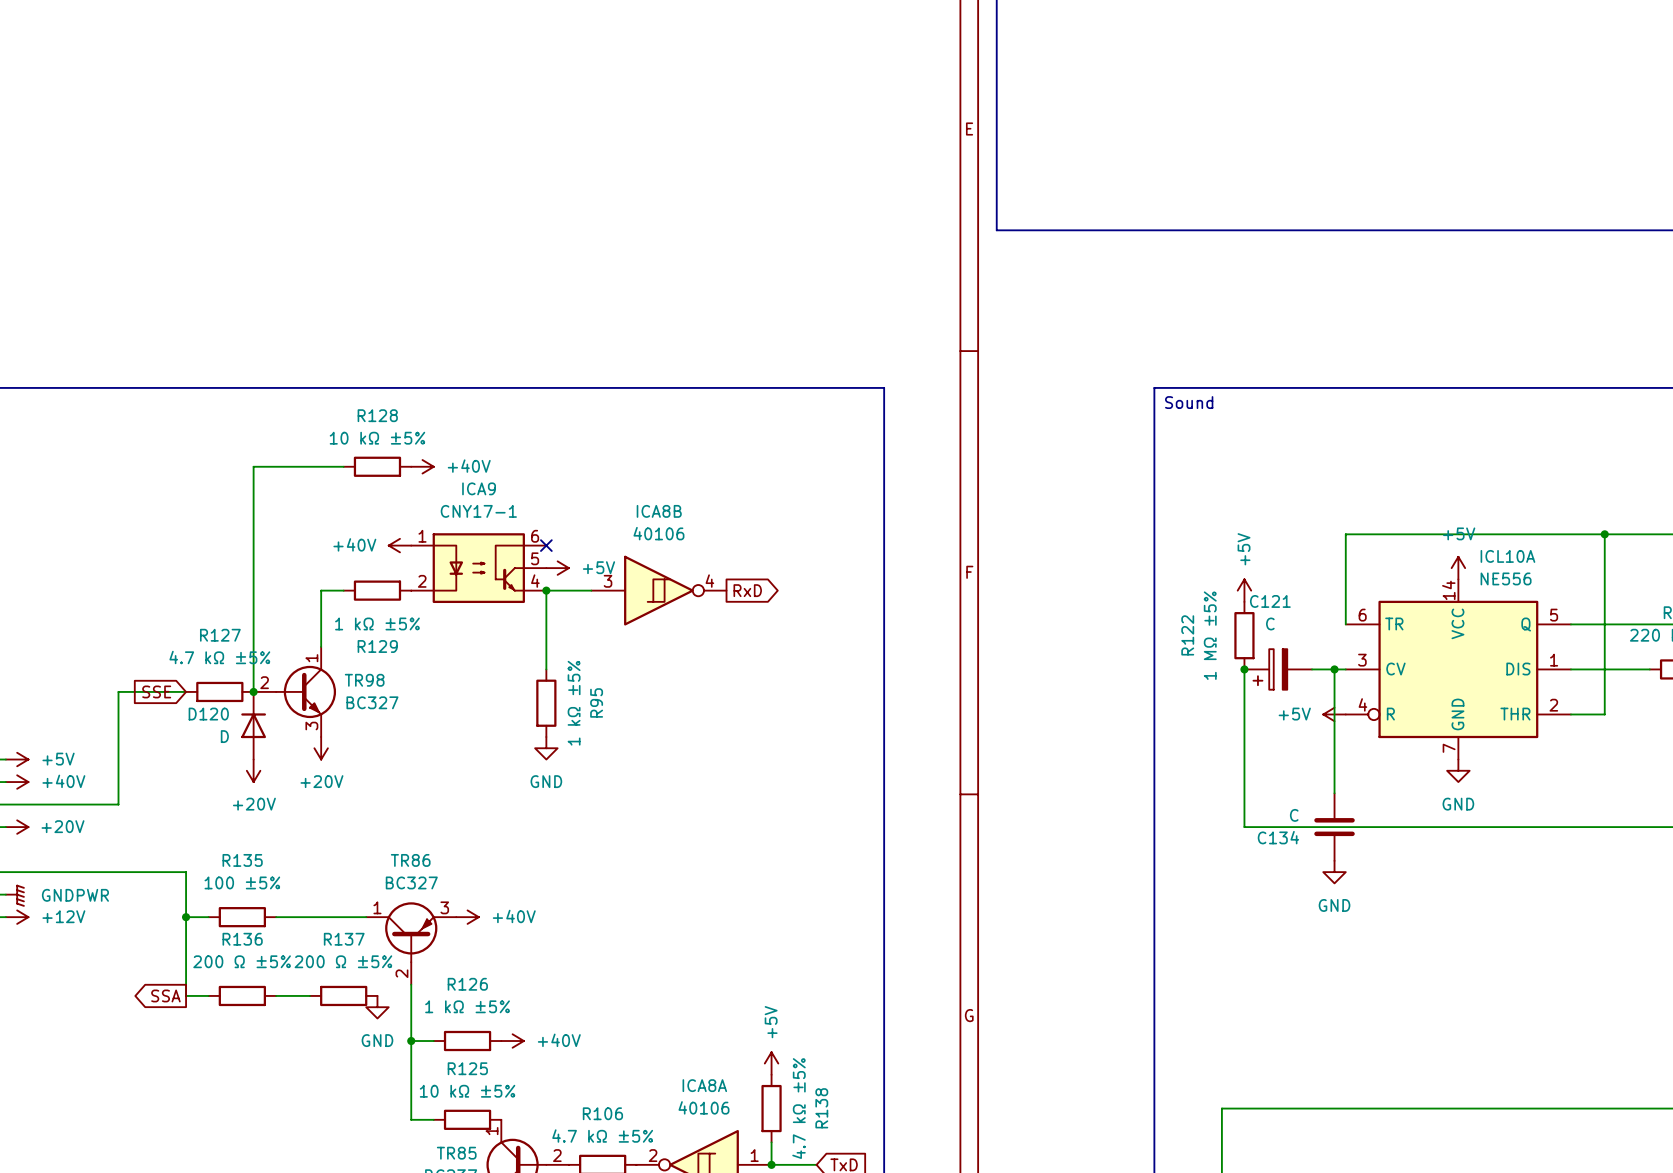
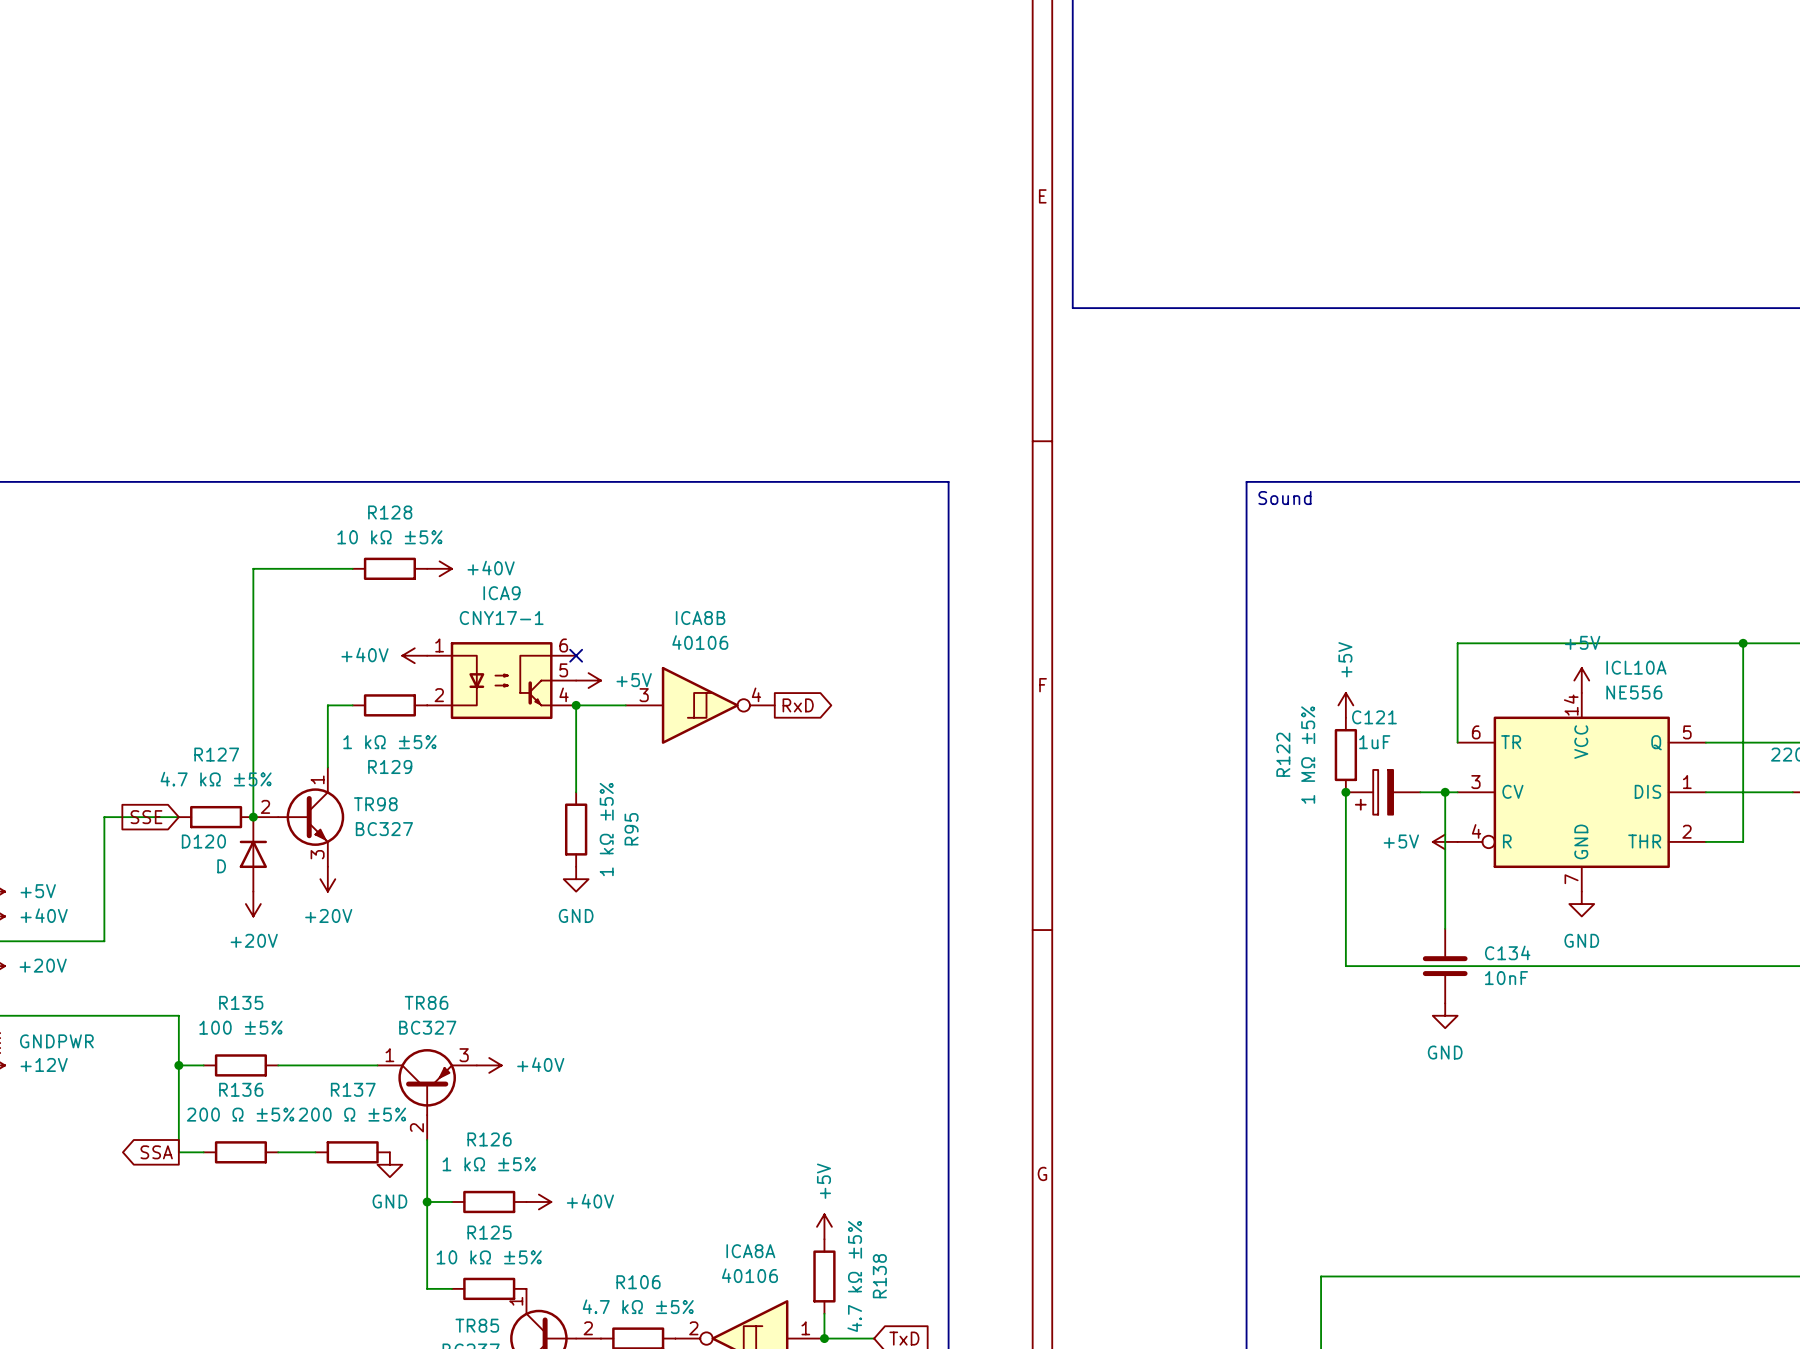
C121 value: C (1270, 623) -> 1uF (1374, 742)
C134 value: C (1294, 815) -> 10nF (1506, 978)
C134 name position: C134 (1278, 837) -> C134 (1507, 952)

